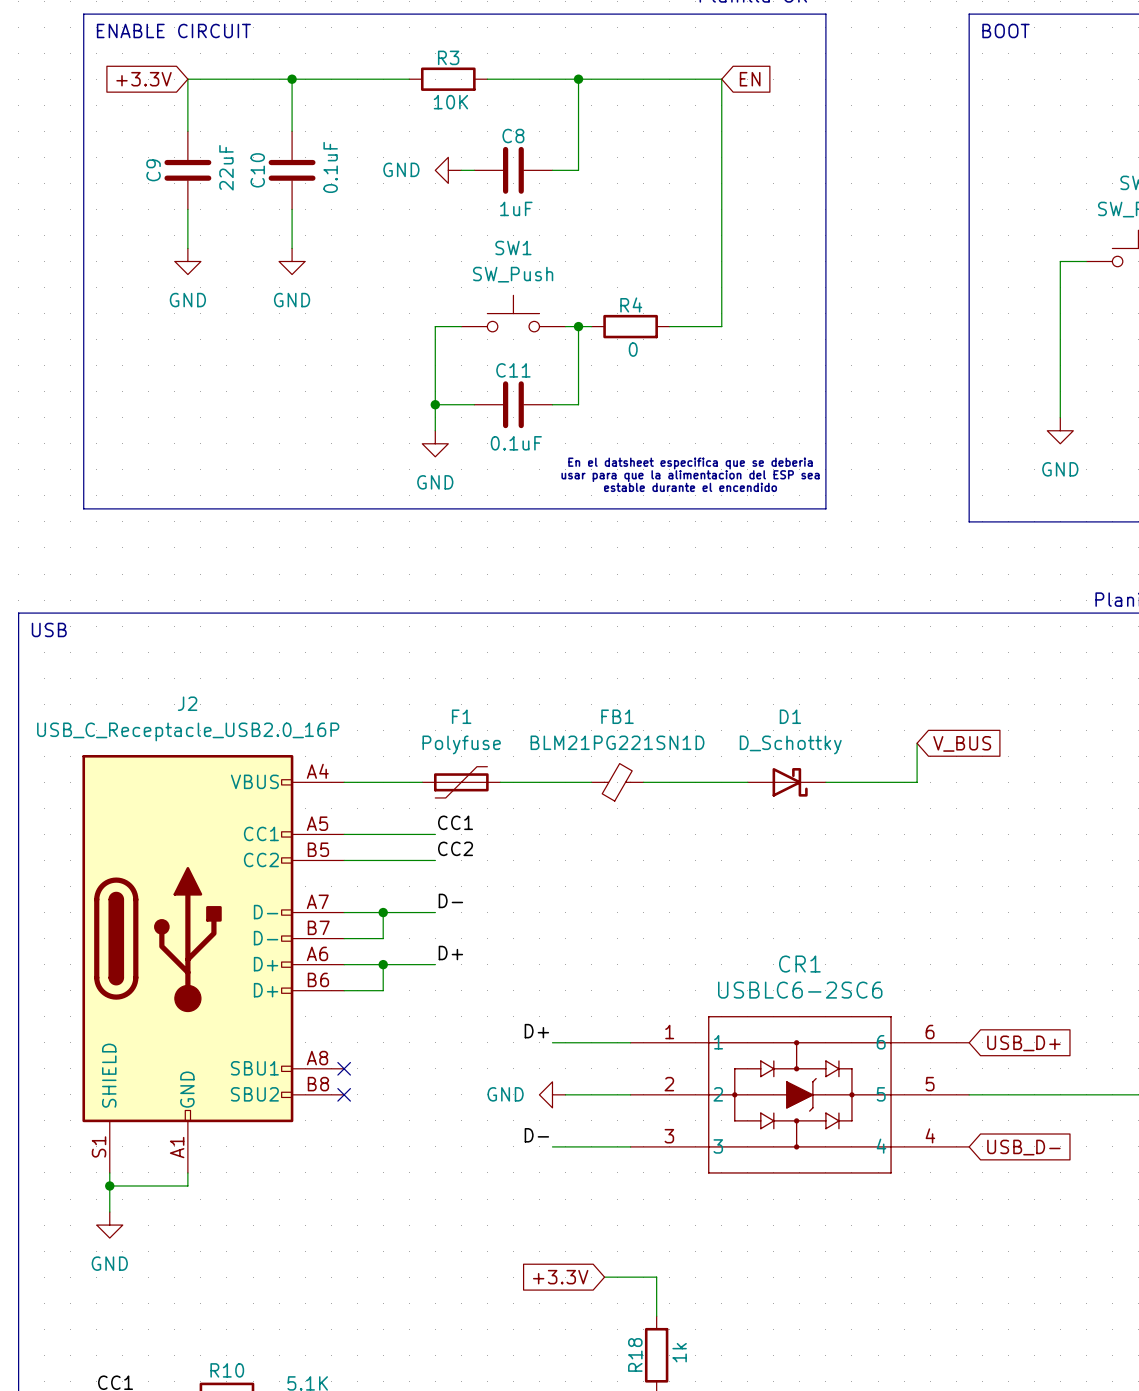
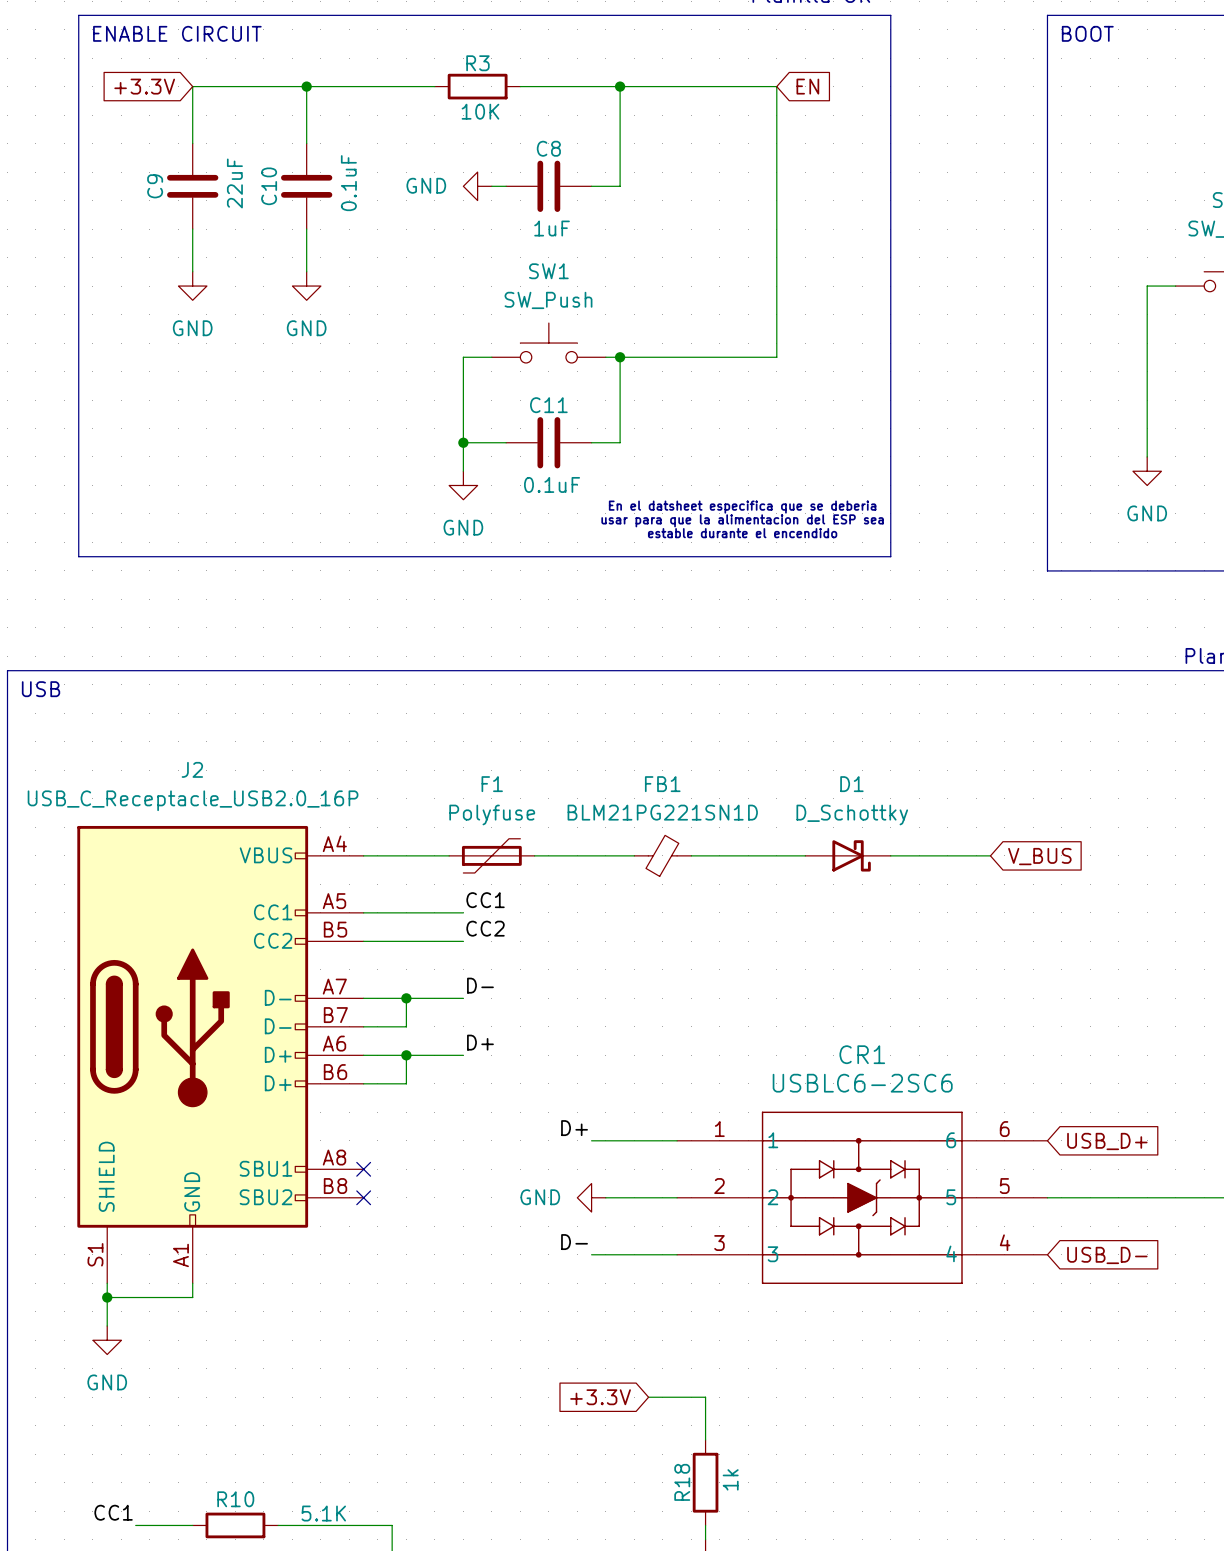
wire: none -> (634, 357) (719, 357)
R4: 0 (630, 326) -> none
wire: (917, 743) (917, 782) -> none
global label position: V_BUS (962, 743) -> V_BUS (1039, 856)

